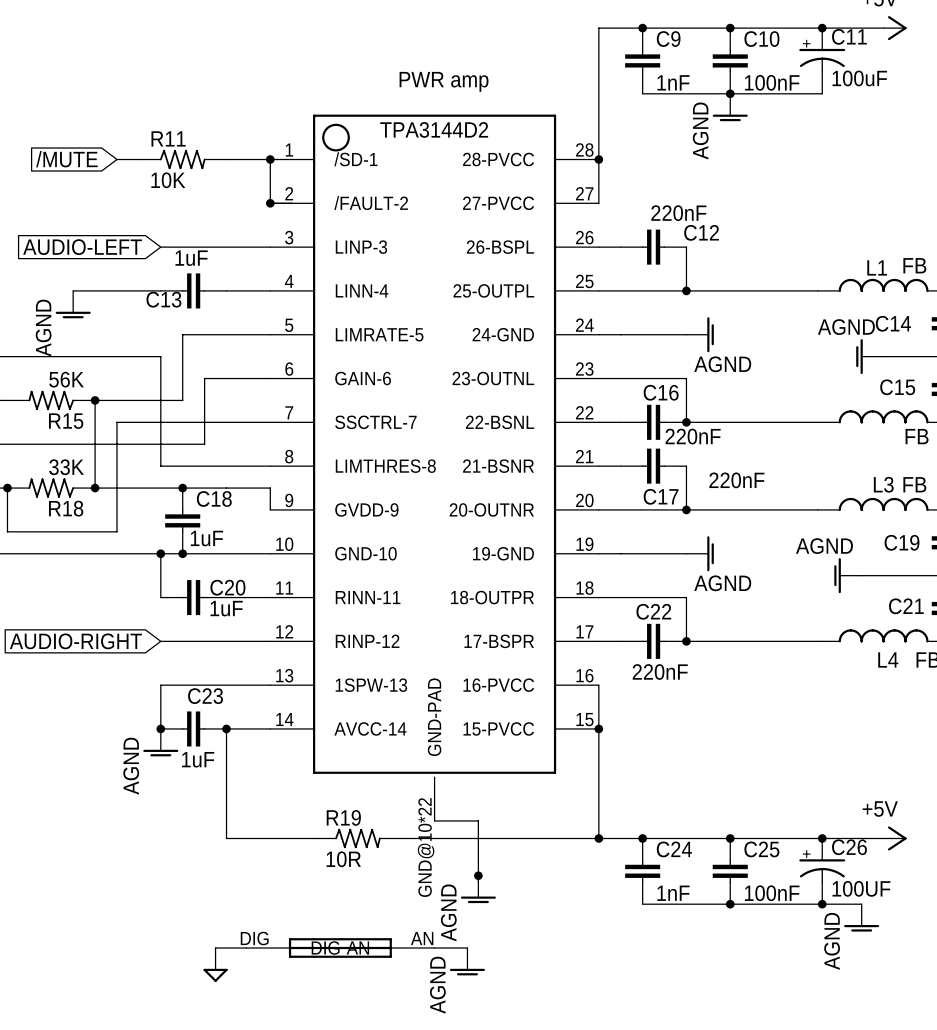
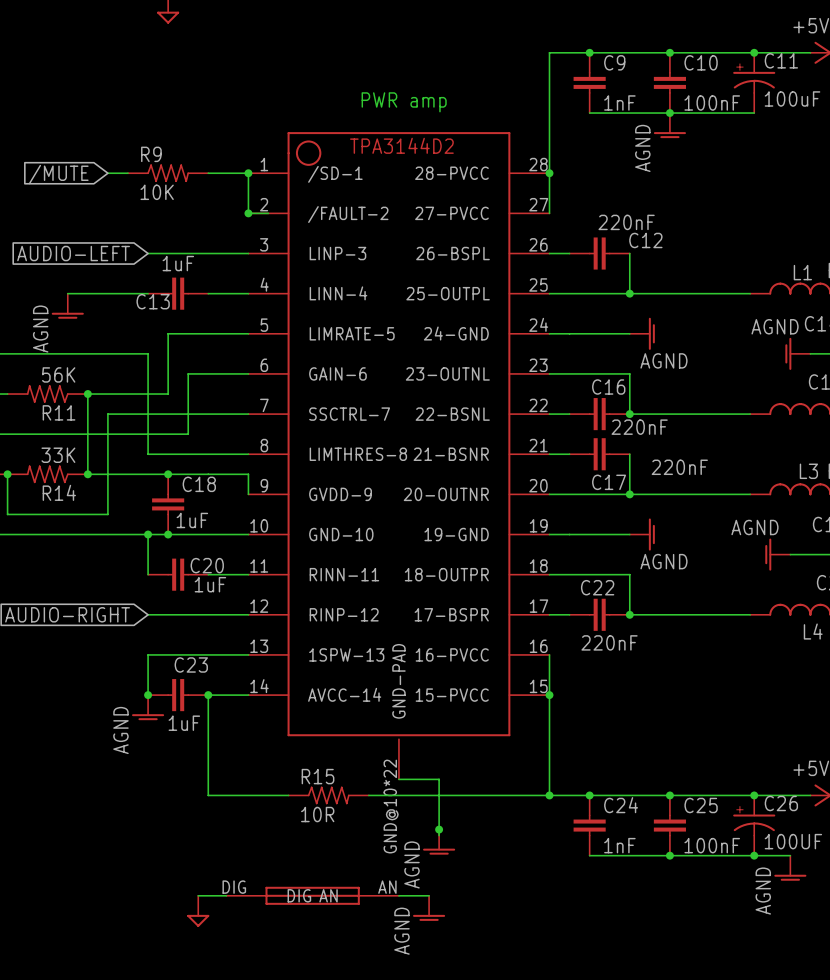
R11 name: R11 (168, 138) -> R9 (151, 154)
R15 name: R15 (66, 421) -> R11 (59, 412)
R18 name: R18 (66, 508) -> R14 (59, 492)
R19 name: R19 (343, 817) -> R15 (318, 776)

